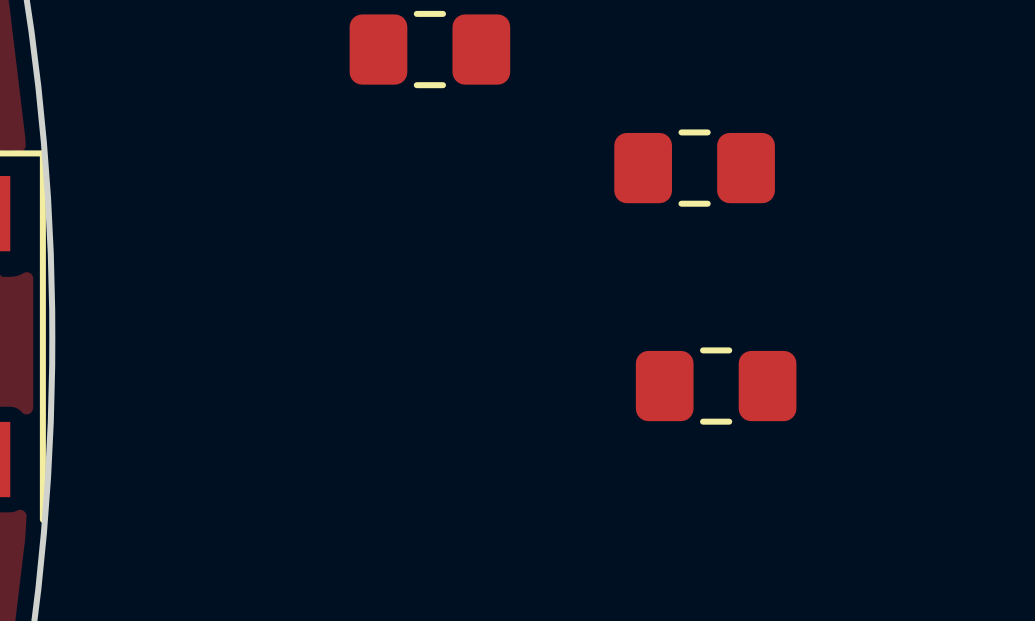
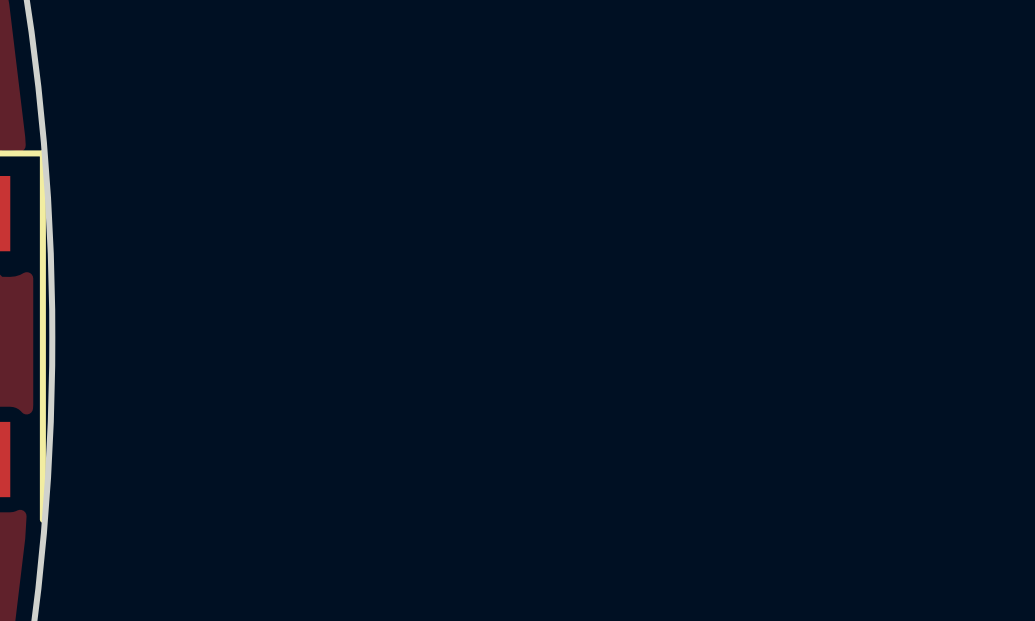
part: (429, 49) -> none
part: (694, 168) -> none
part: (716, 386) -> none

